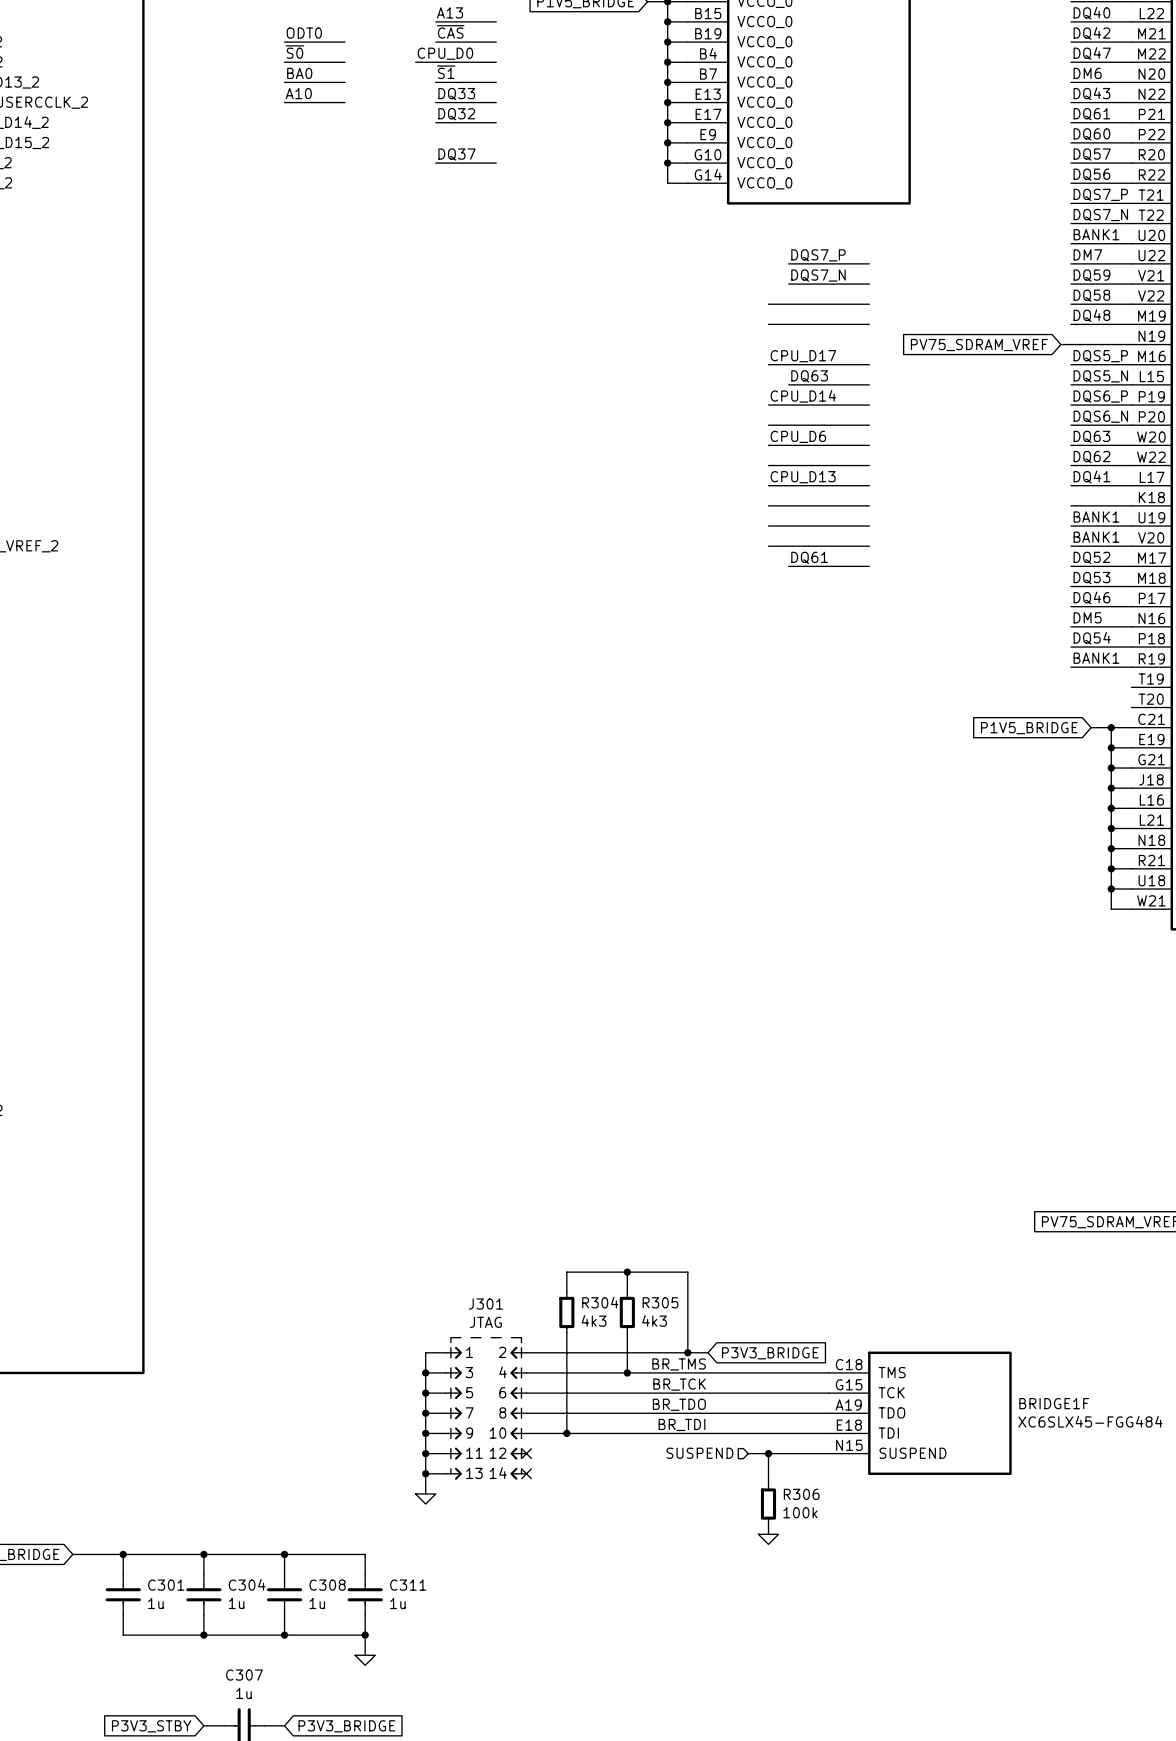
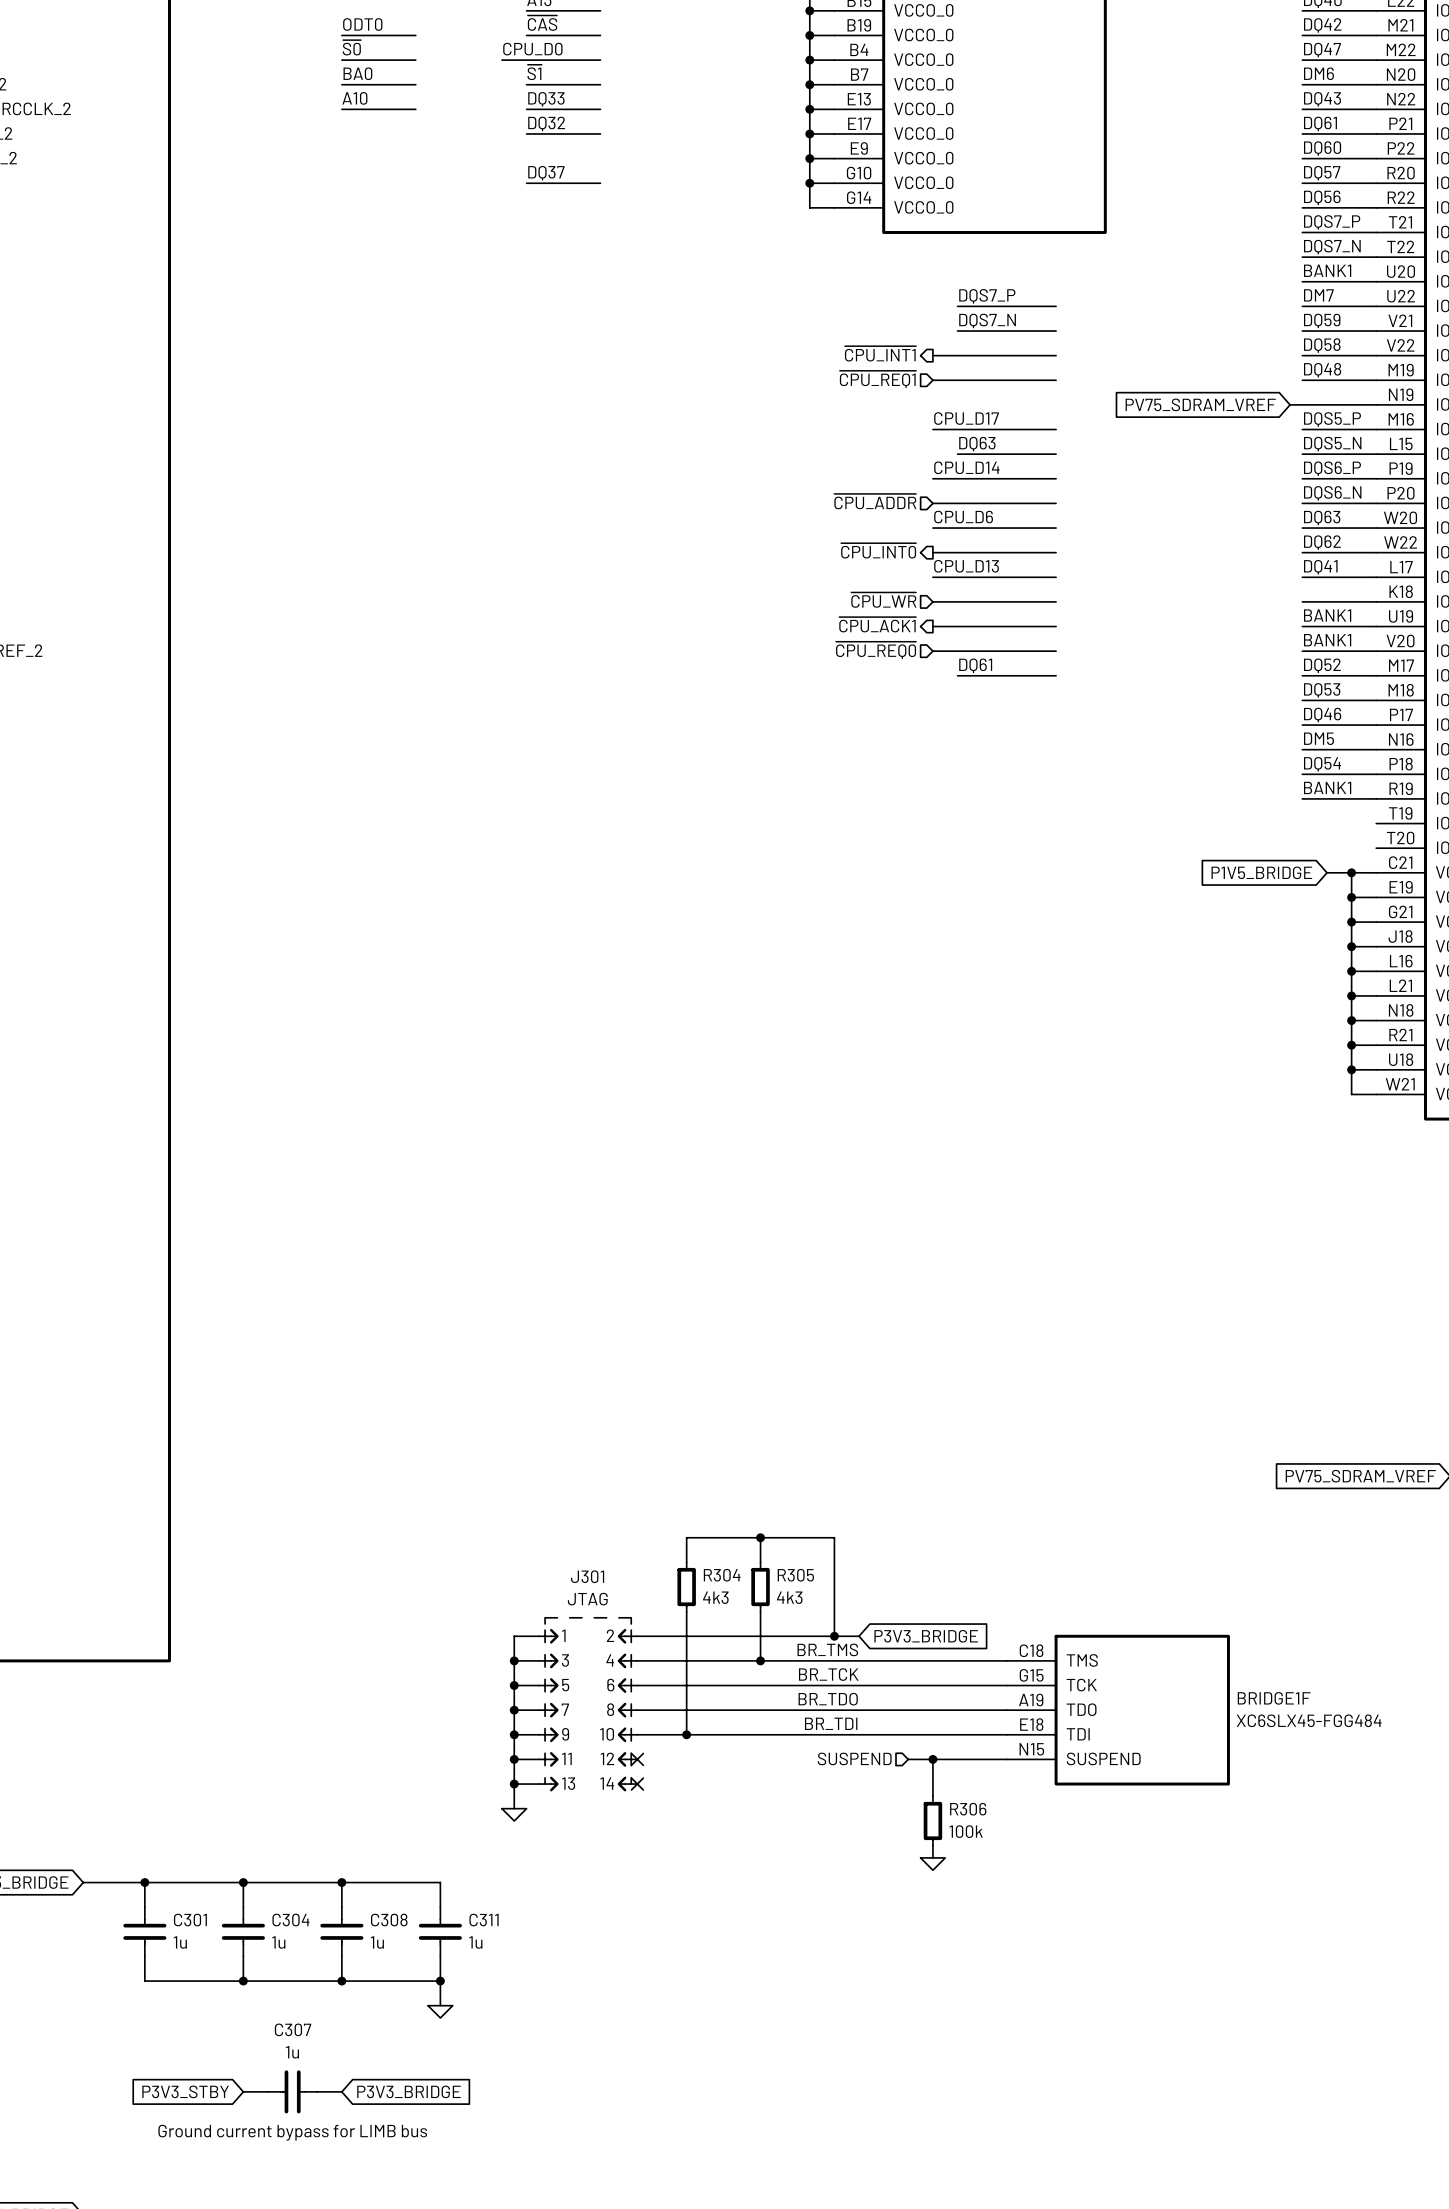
hierarchical label: none -> ~{CPU_INT1} (880, 353)
hierarchical label: none -> ~{CPU_REQ1} (877, 379)
hierarchical label: none -> ~{CPU_ADDR} (875, 501)
hierarchical label: none -> ~{CPU_INT0} (878, 550)
hierarchical label: none -> ~{CPU_WR} (883, 600)
hierarchical label: none -> ~{CPU_ACK1} (877, 624)
hierarchical label: none -> ~{CPU_REQ0} (876, 650)

